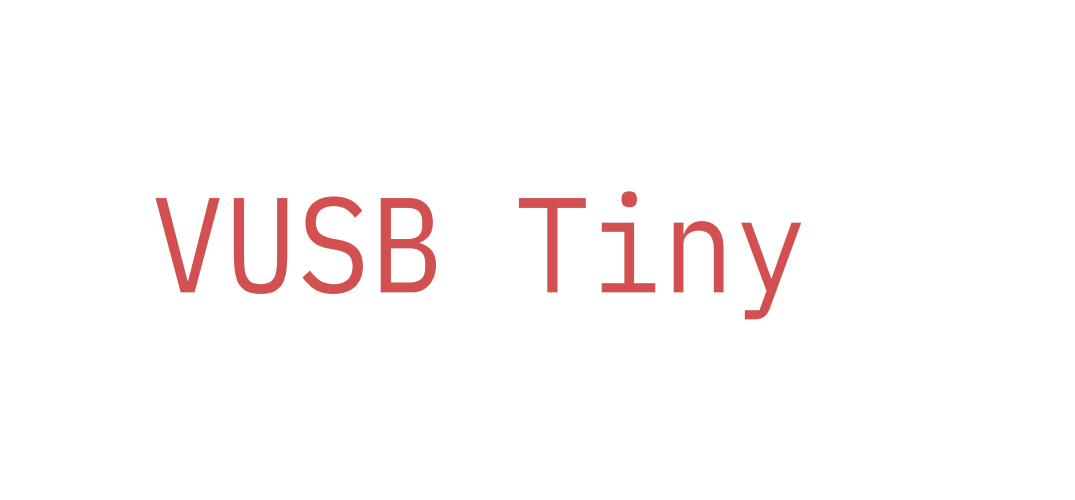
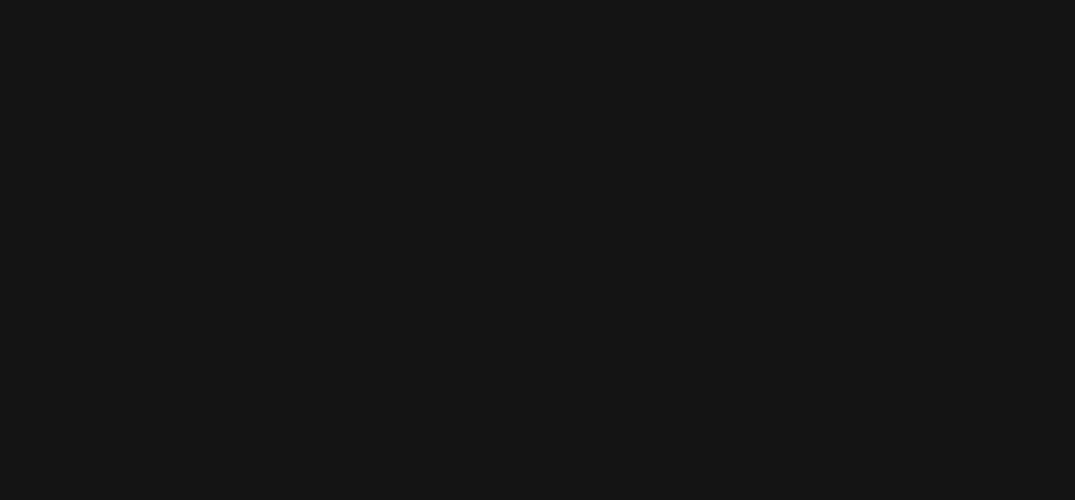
text: VUSB Tiny (478, 255) -> none

